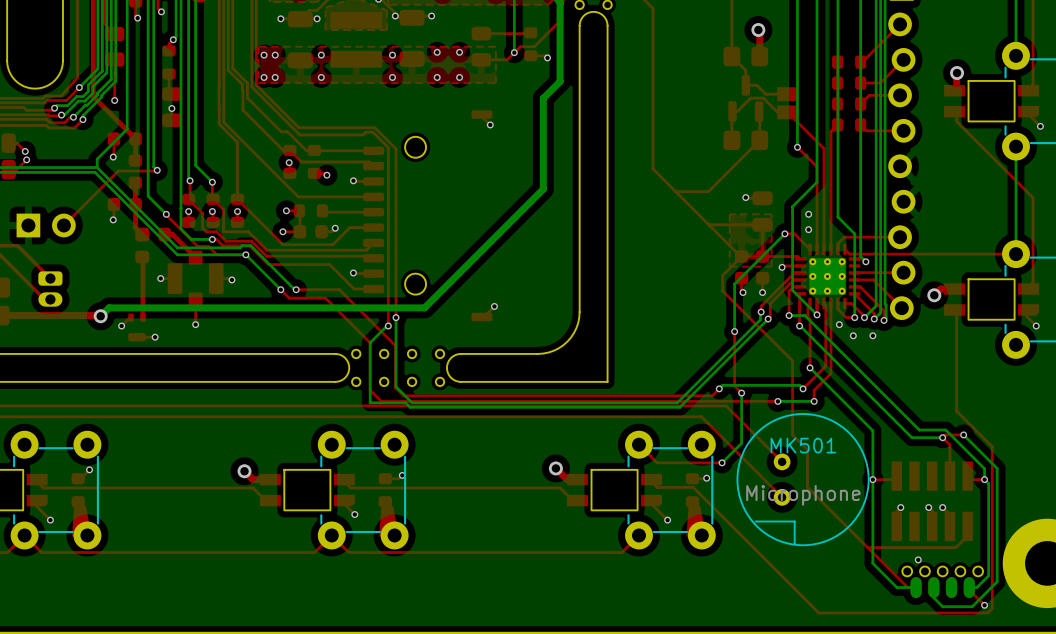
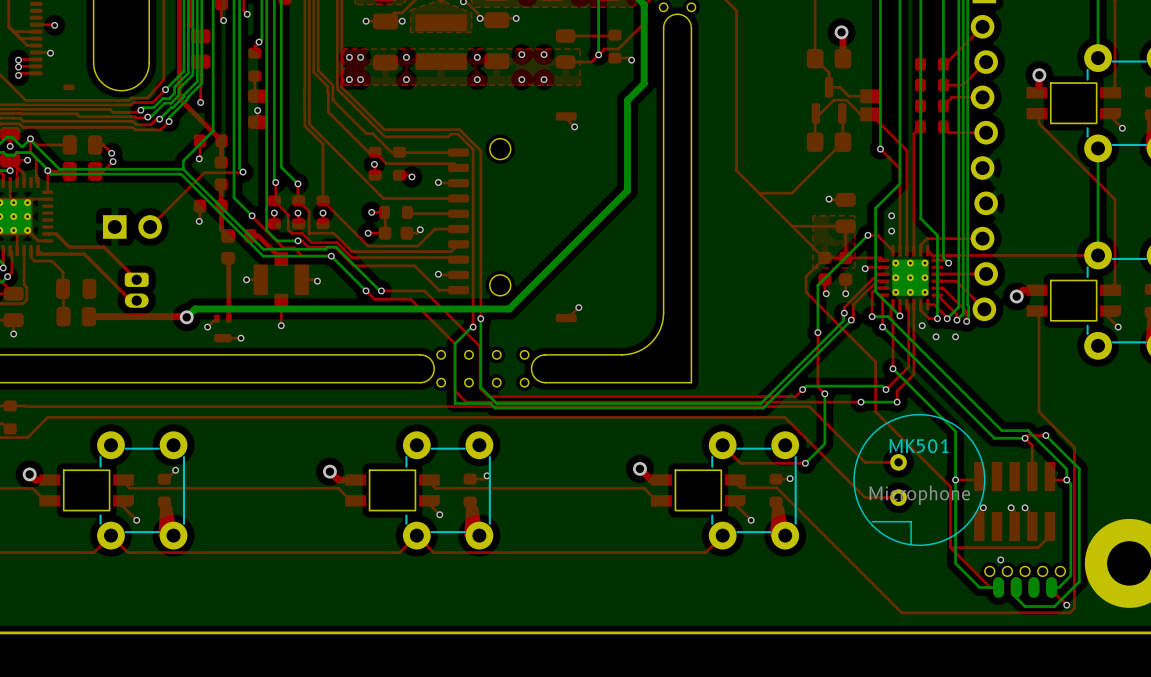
top track: (792, 411) (792, 434) (807, 449) (807, 487) (867, 547) -> (875, 411) (950, 486) (950, 547)
top track: none -> (898, 462) (865, 462)
MK501 position: (803, 479) -> (919, 479)
top track: none -> (898, 497) (865, 497)

